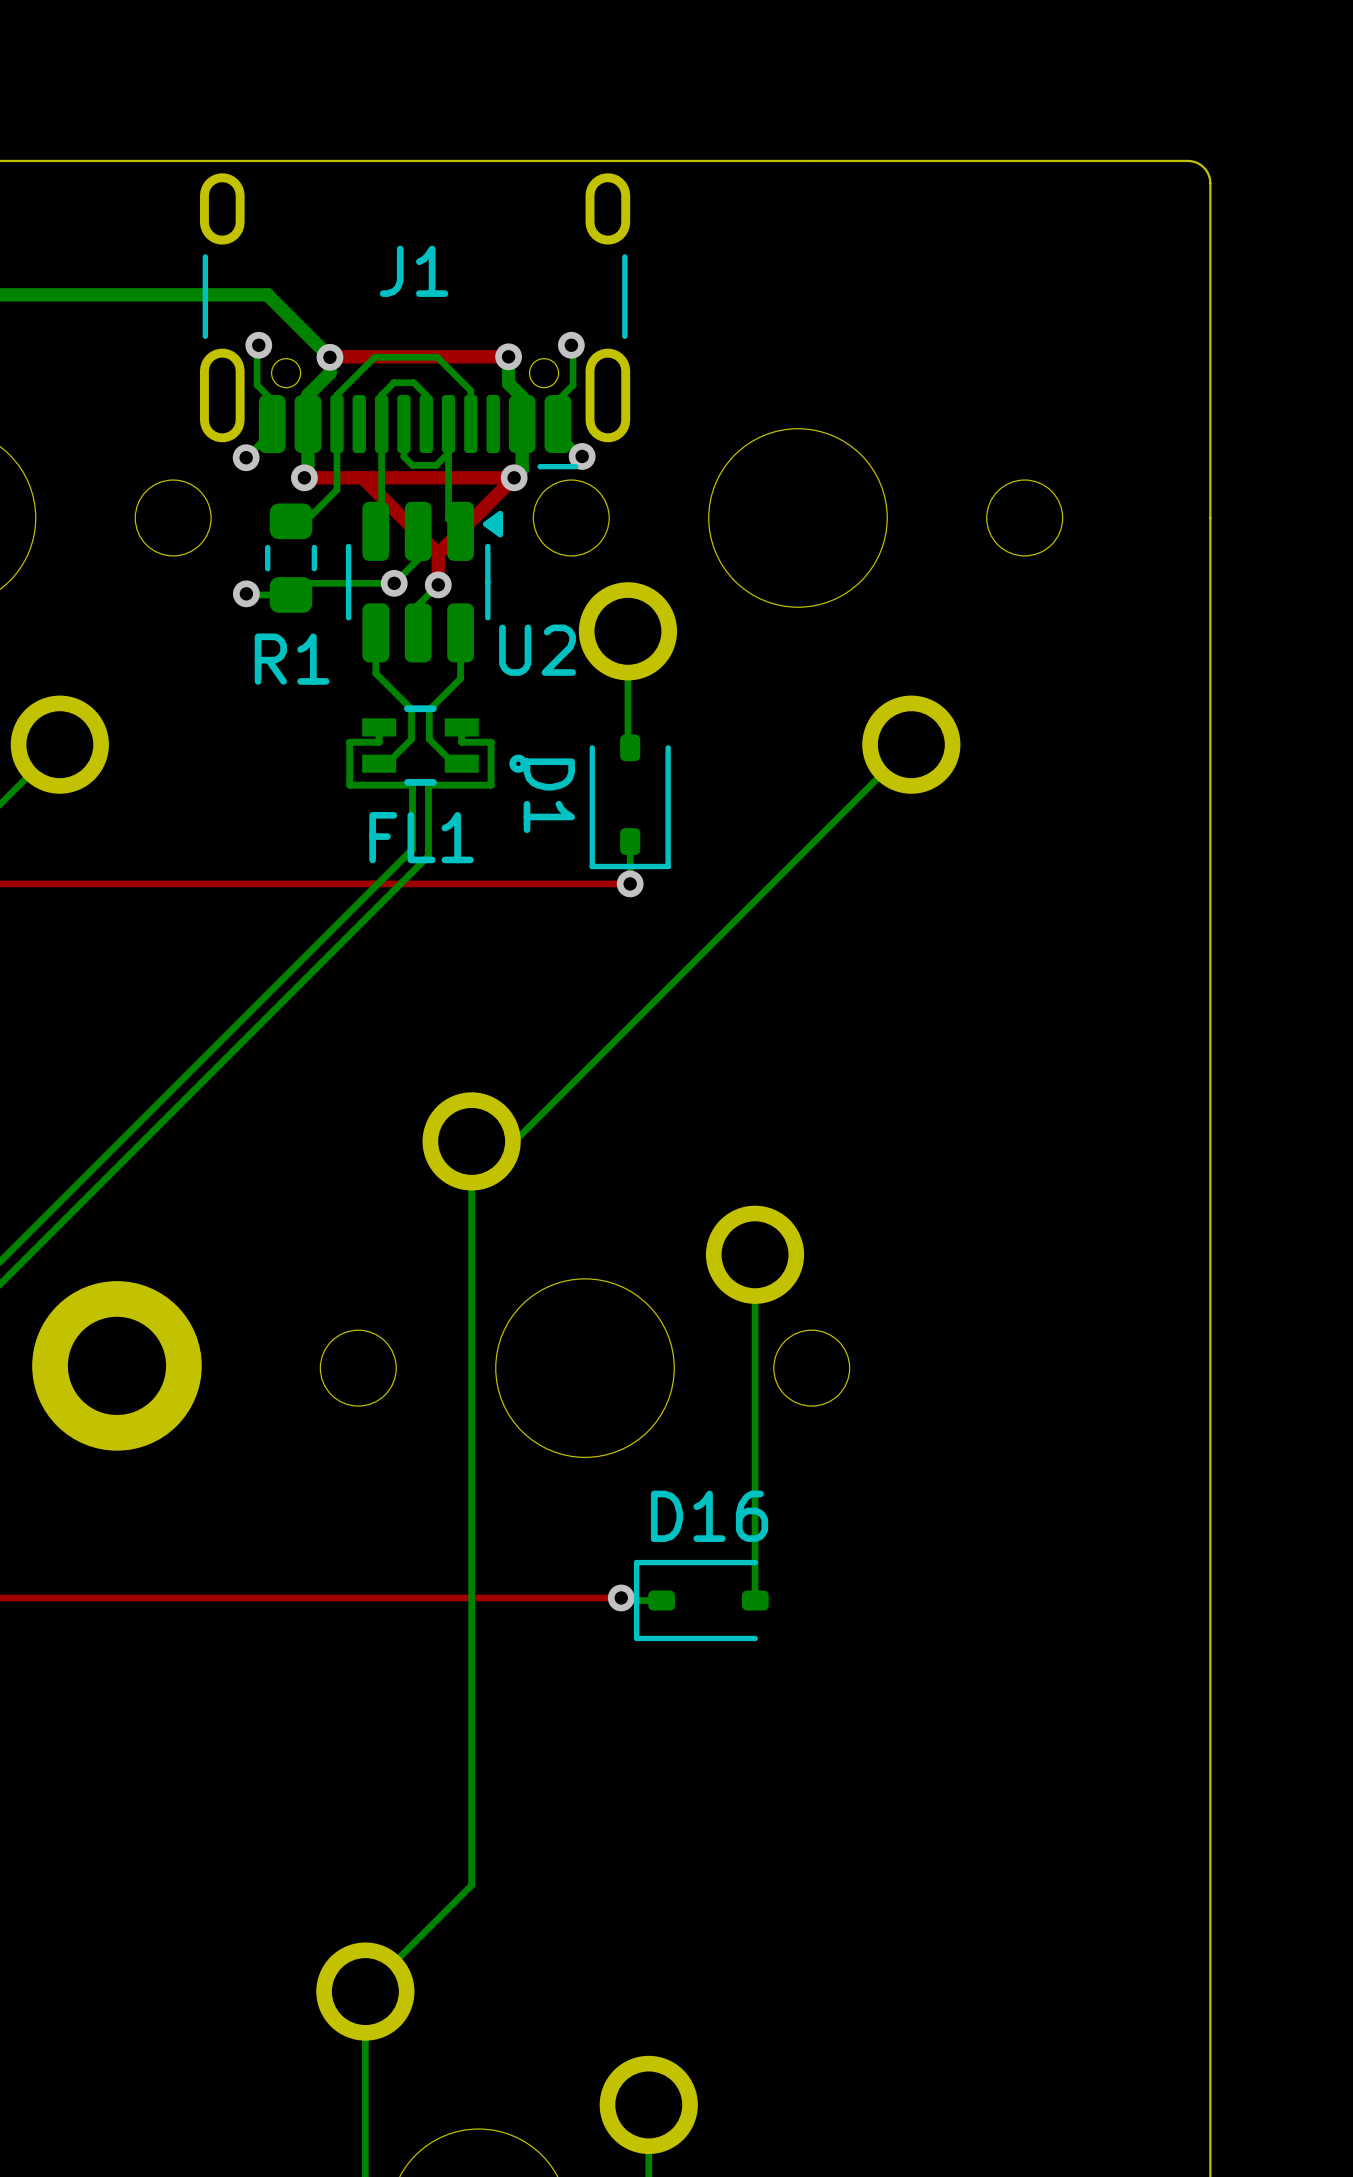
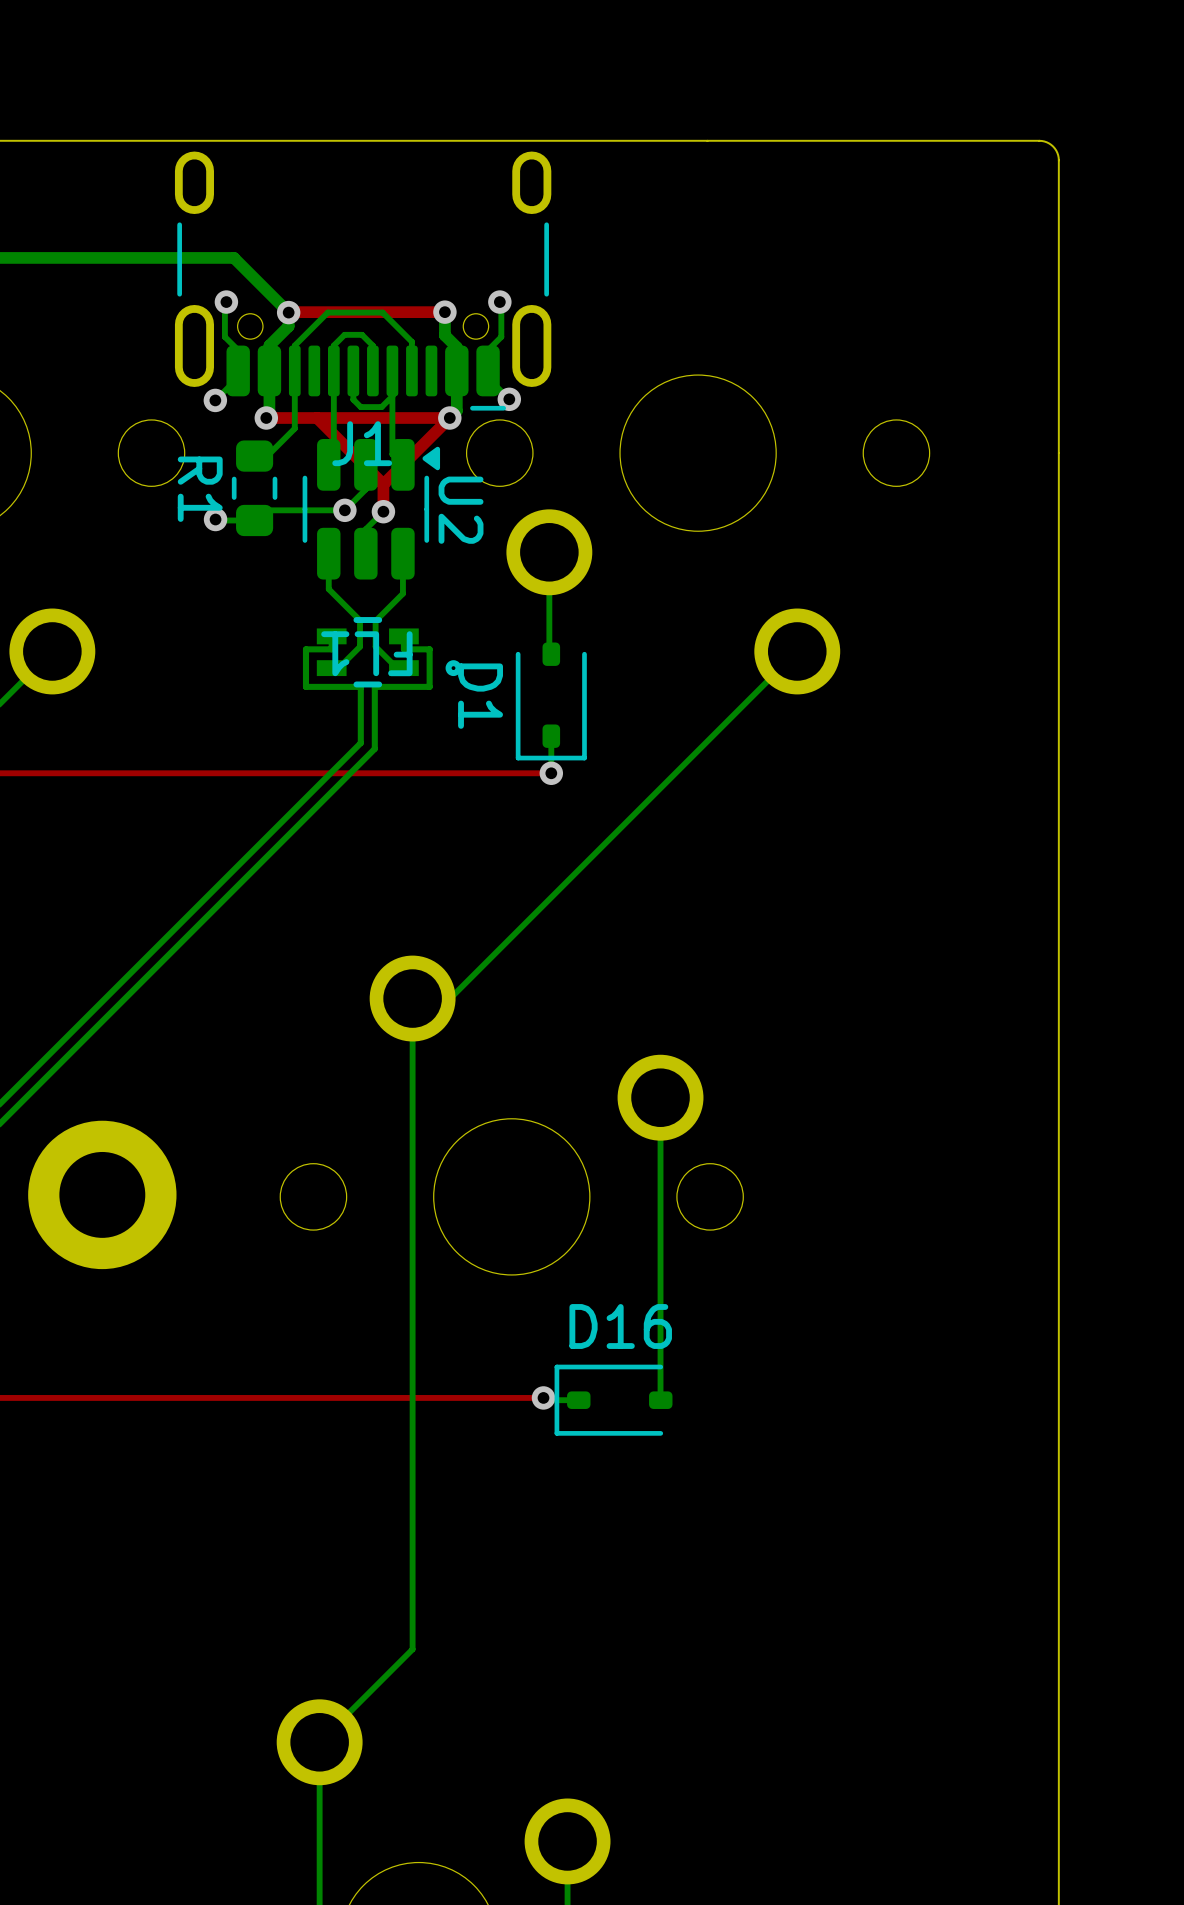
J1 name position: J1 (414, 271) -> J1 (362, 443)
U2 name rotation: 0° (537, 650) -> 90° clockwise (461, 510)
R1 name rotation: 0° (292, 659) -> 90° clockwise (200, 489)
R1 name position: R1 (292, 659) -> R1 (200, 489)
FL1 name rotation: 0° (421, 837) -> 180° (366, 653)

